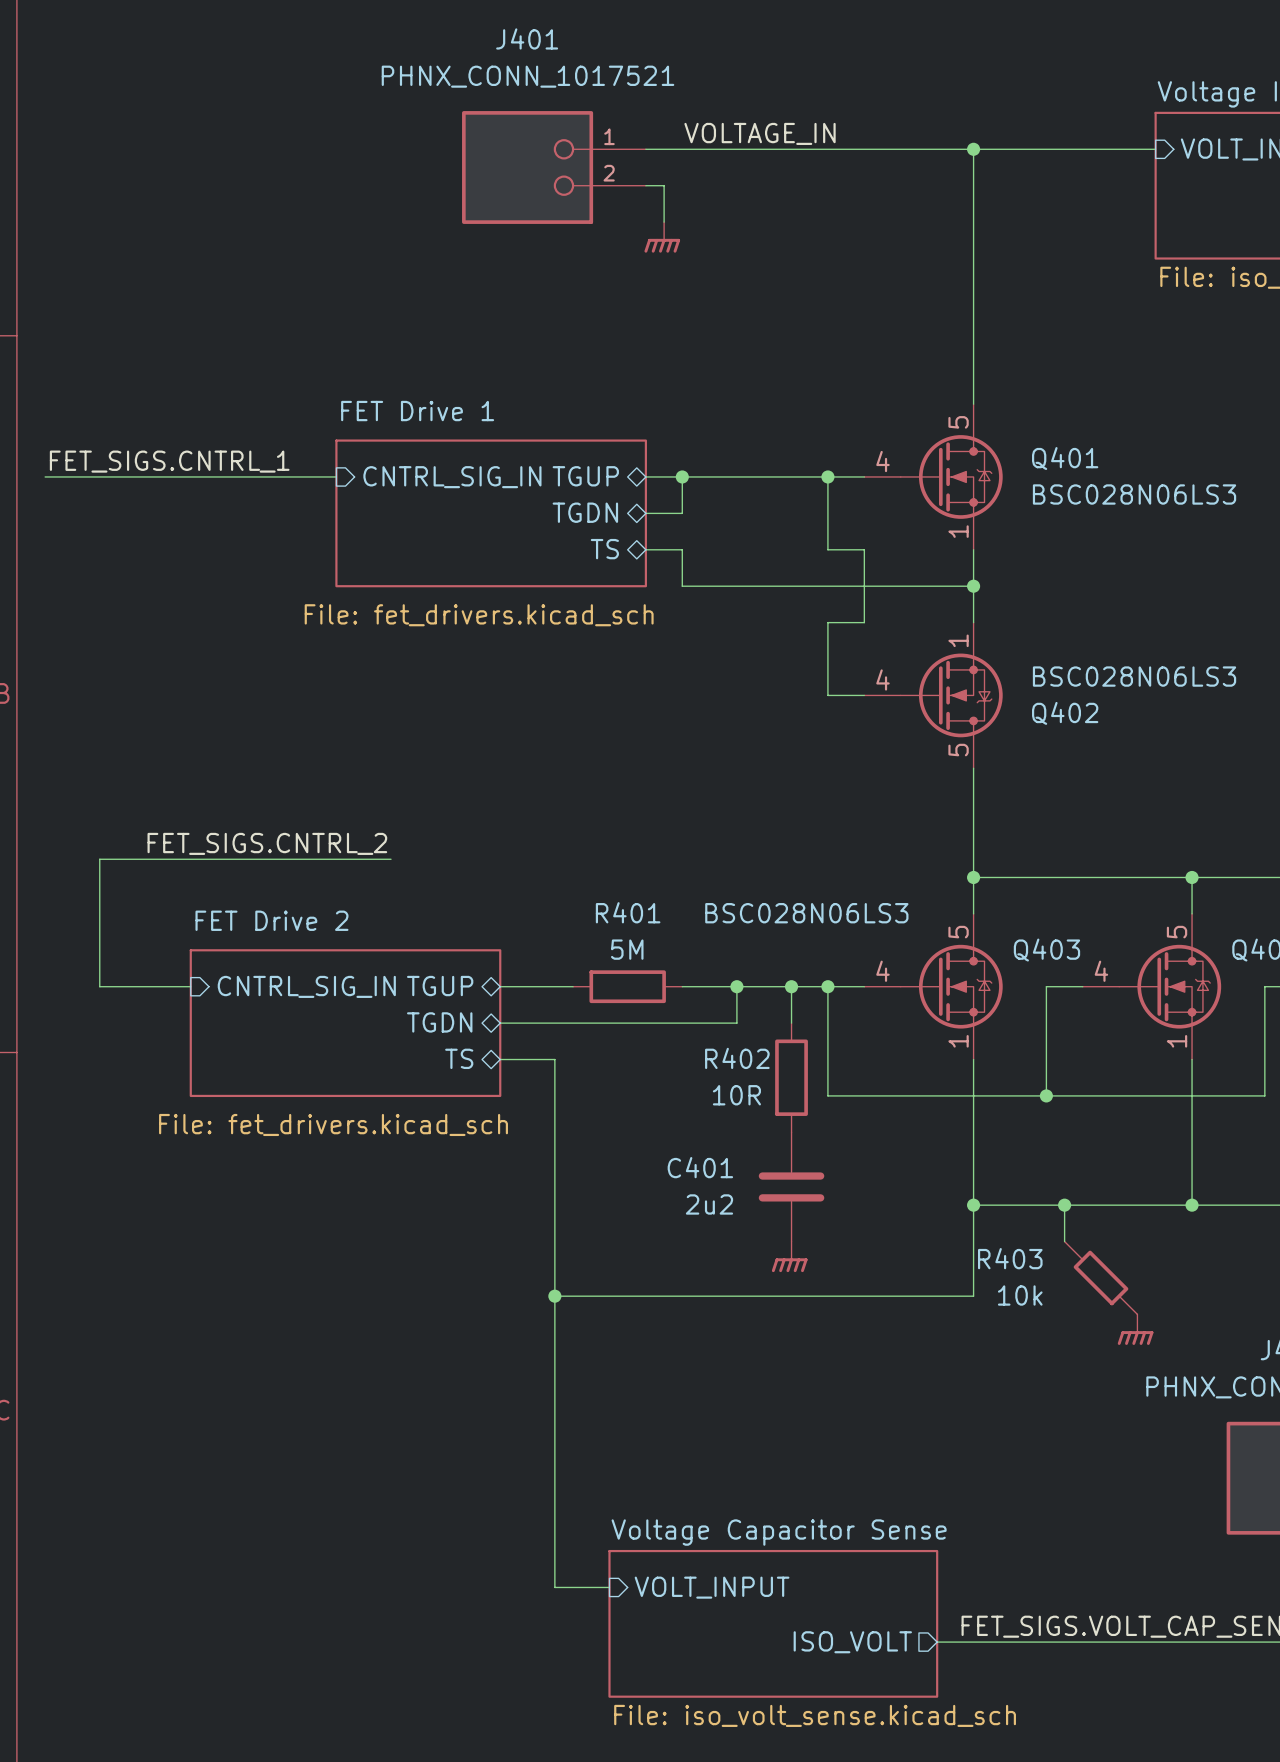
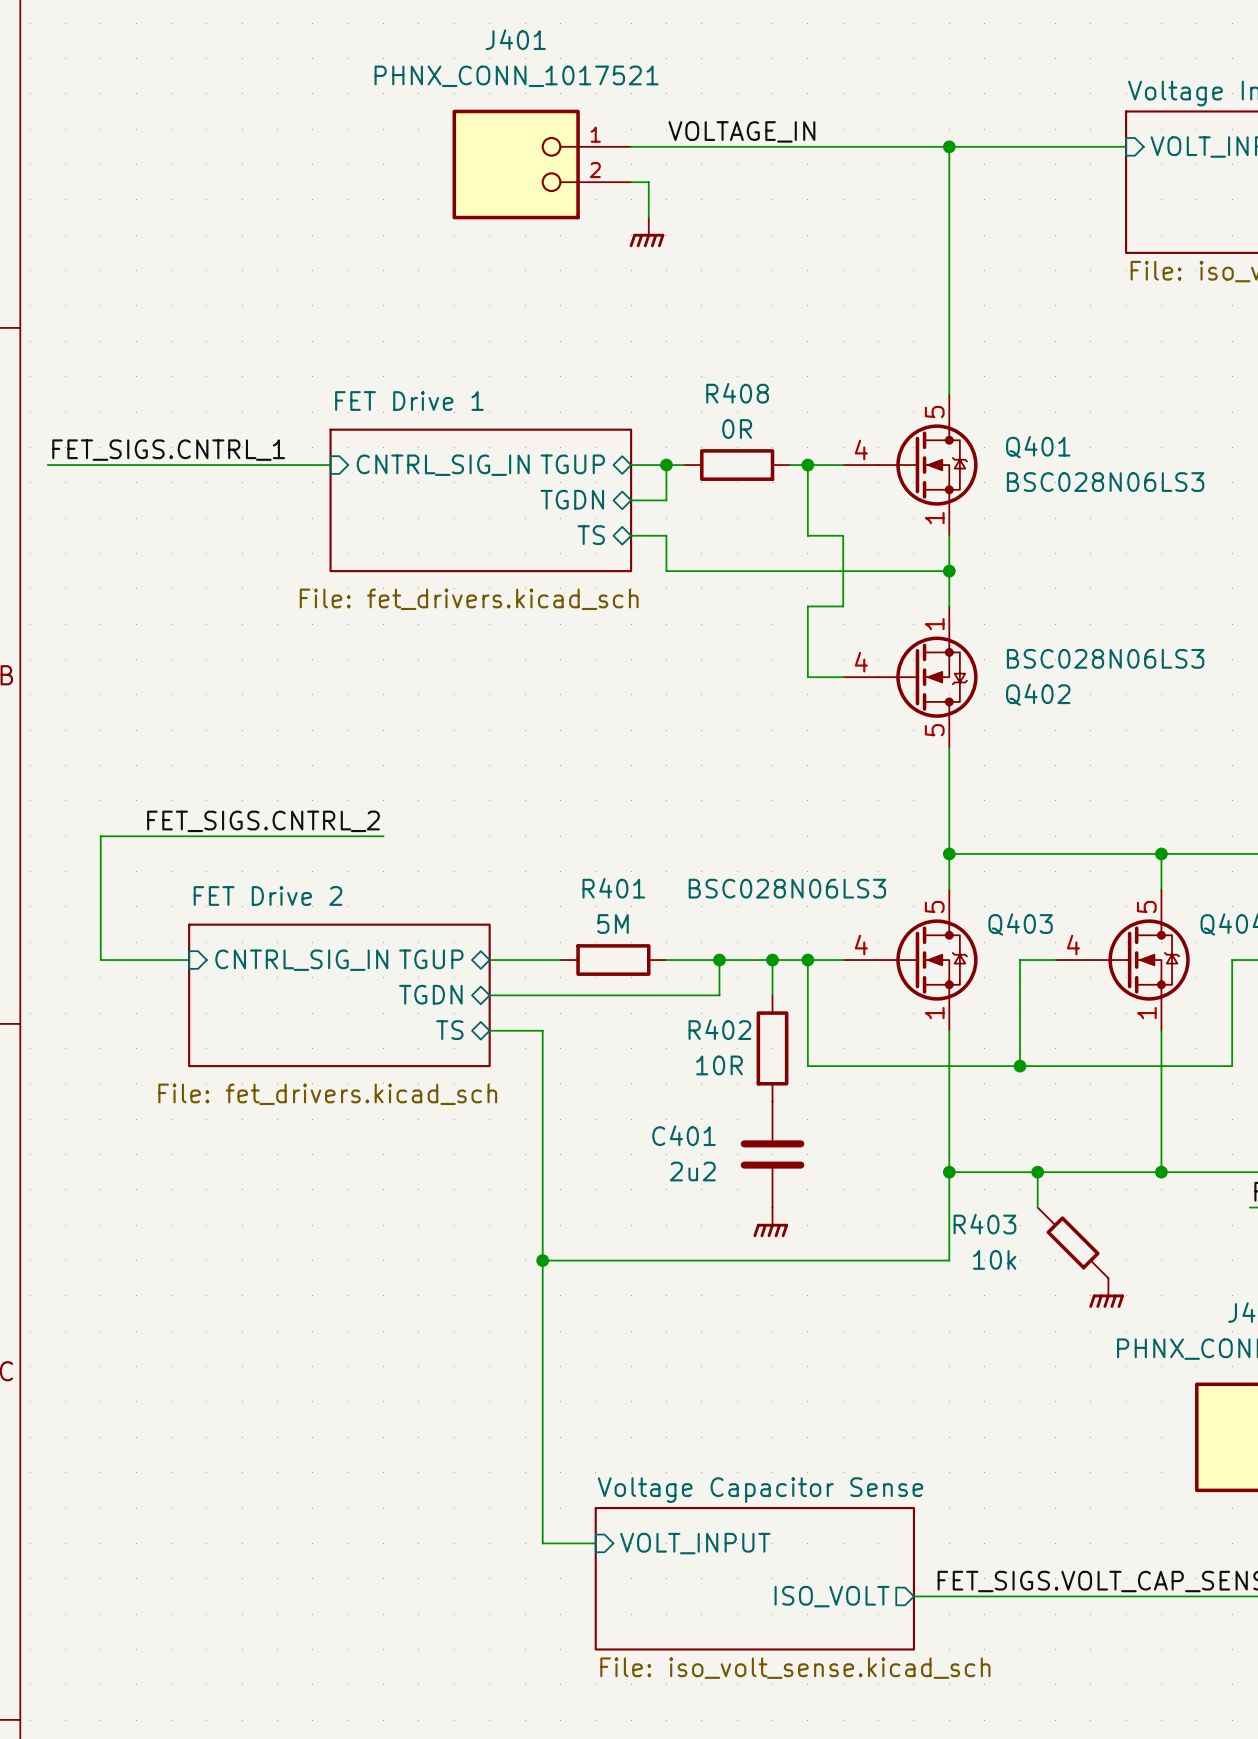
wire: (700, 476) (809, 476) -> none
R408: none -> 0R (737, 465)

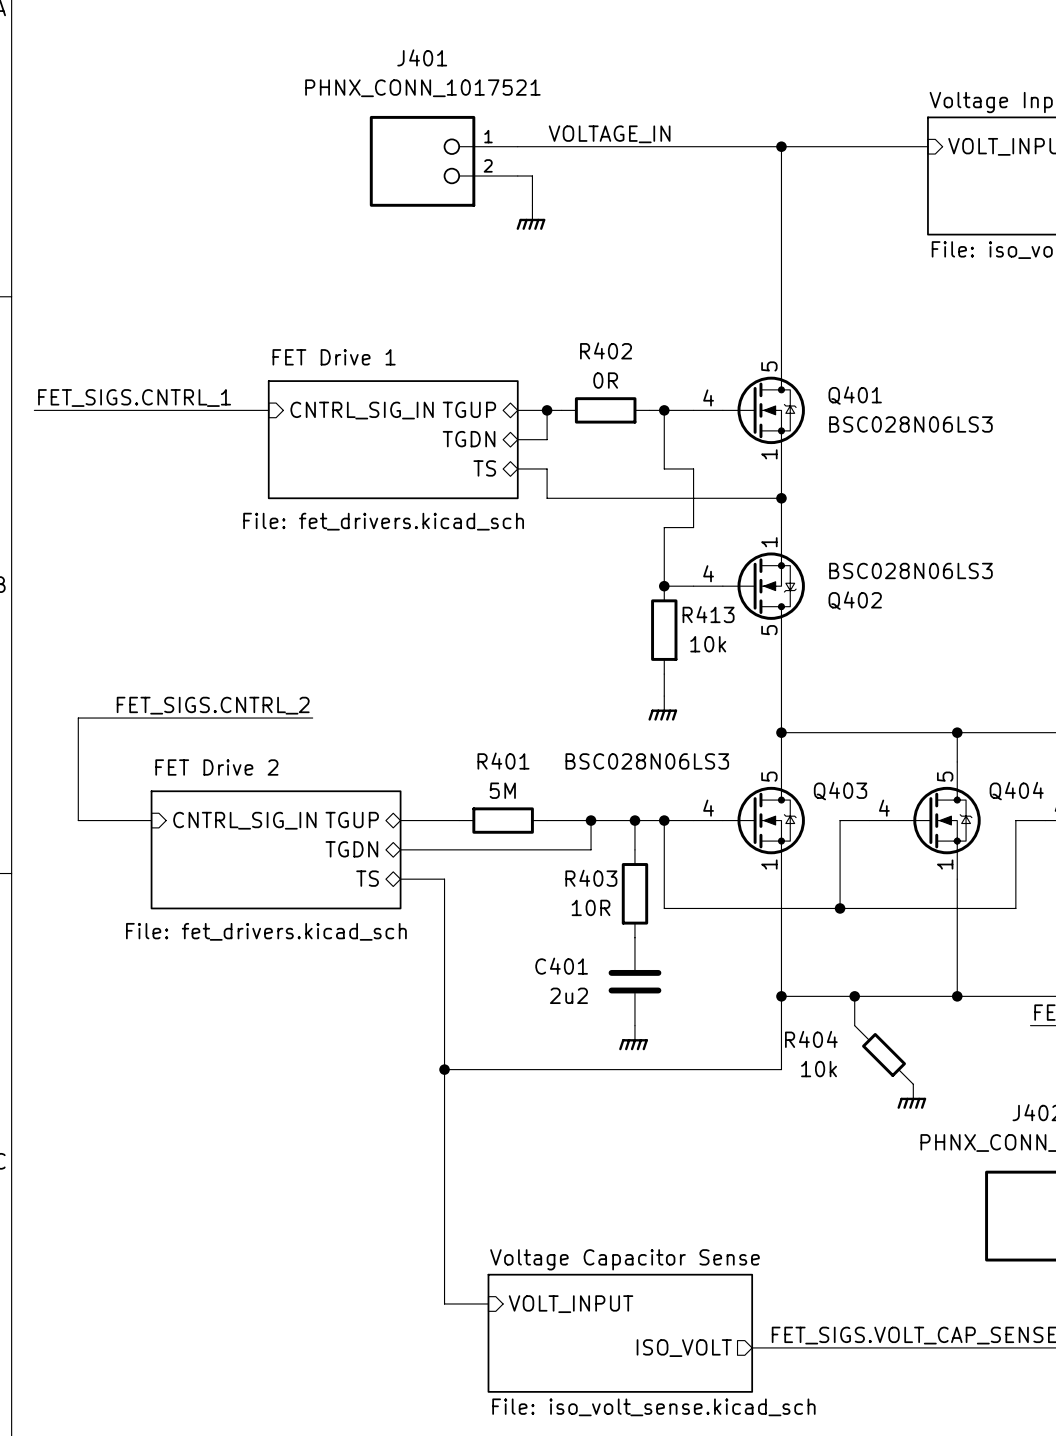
R408 name: R408 (737, 393) -> R402 (606, 350)
junction: none -> (664, 586)
R413: none -> 10k (664, 630)
wire: none -> (664, 674) (664, 696)
power symbol: none -> (662, 708)
R402 name: R402 (719, 1029) -> R403 (591, 878)
R403 name: R403 (984, 1224) -> R404 (811, 1039)

